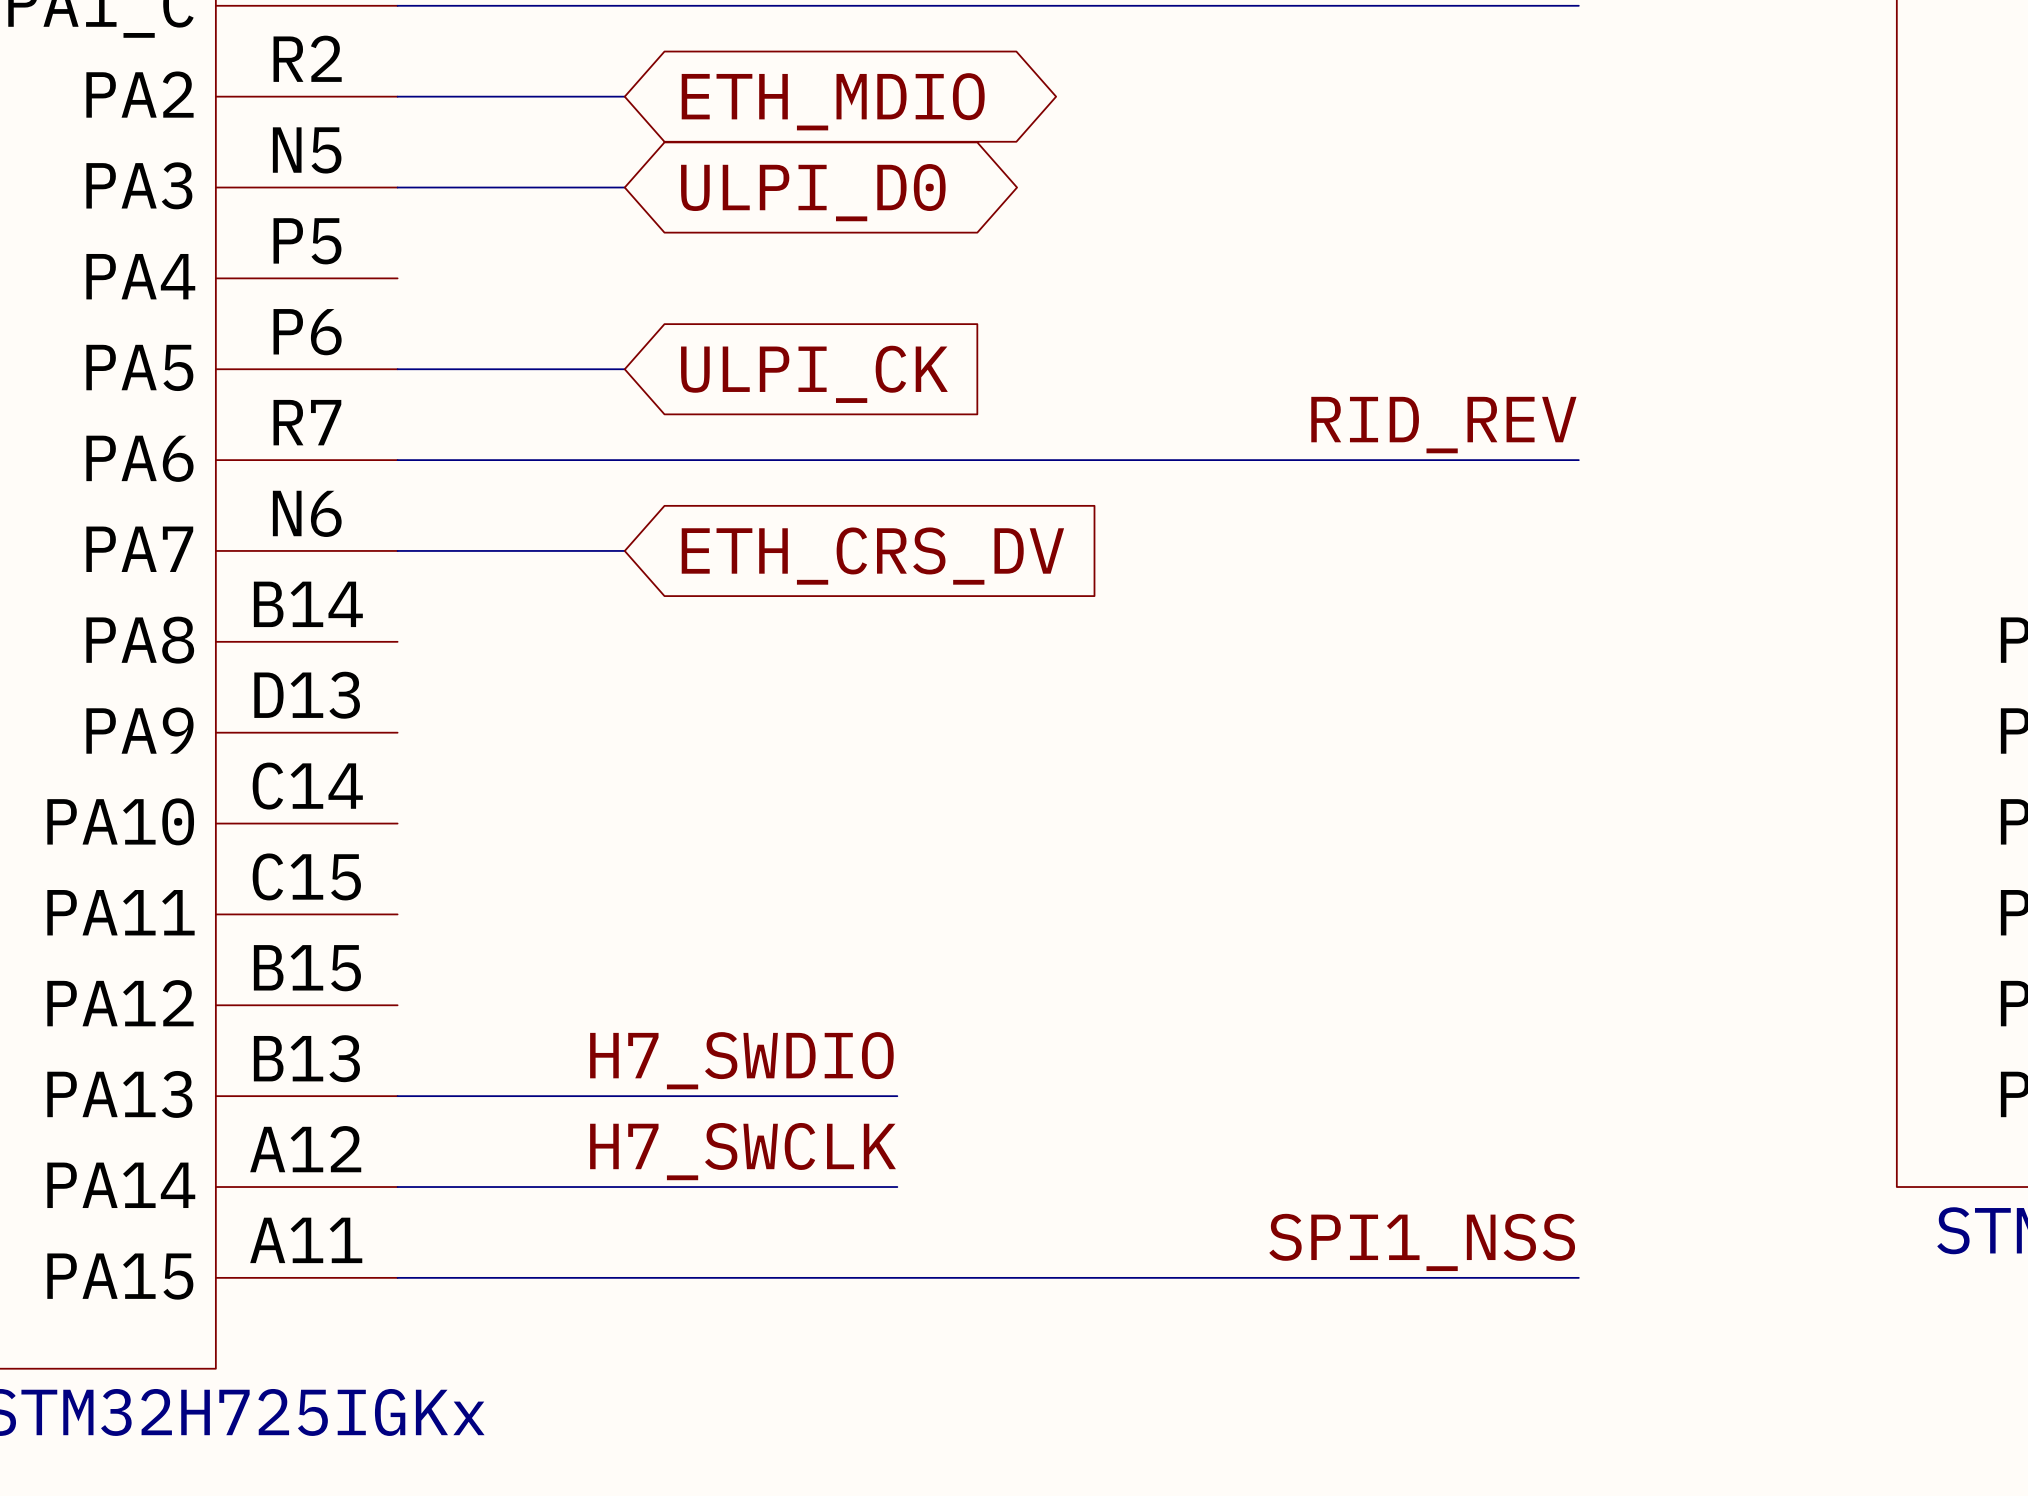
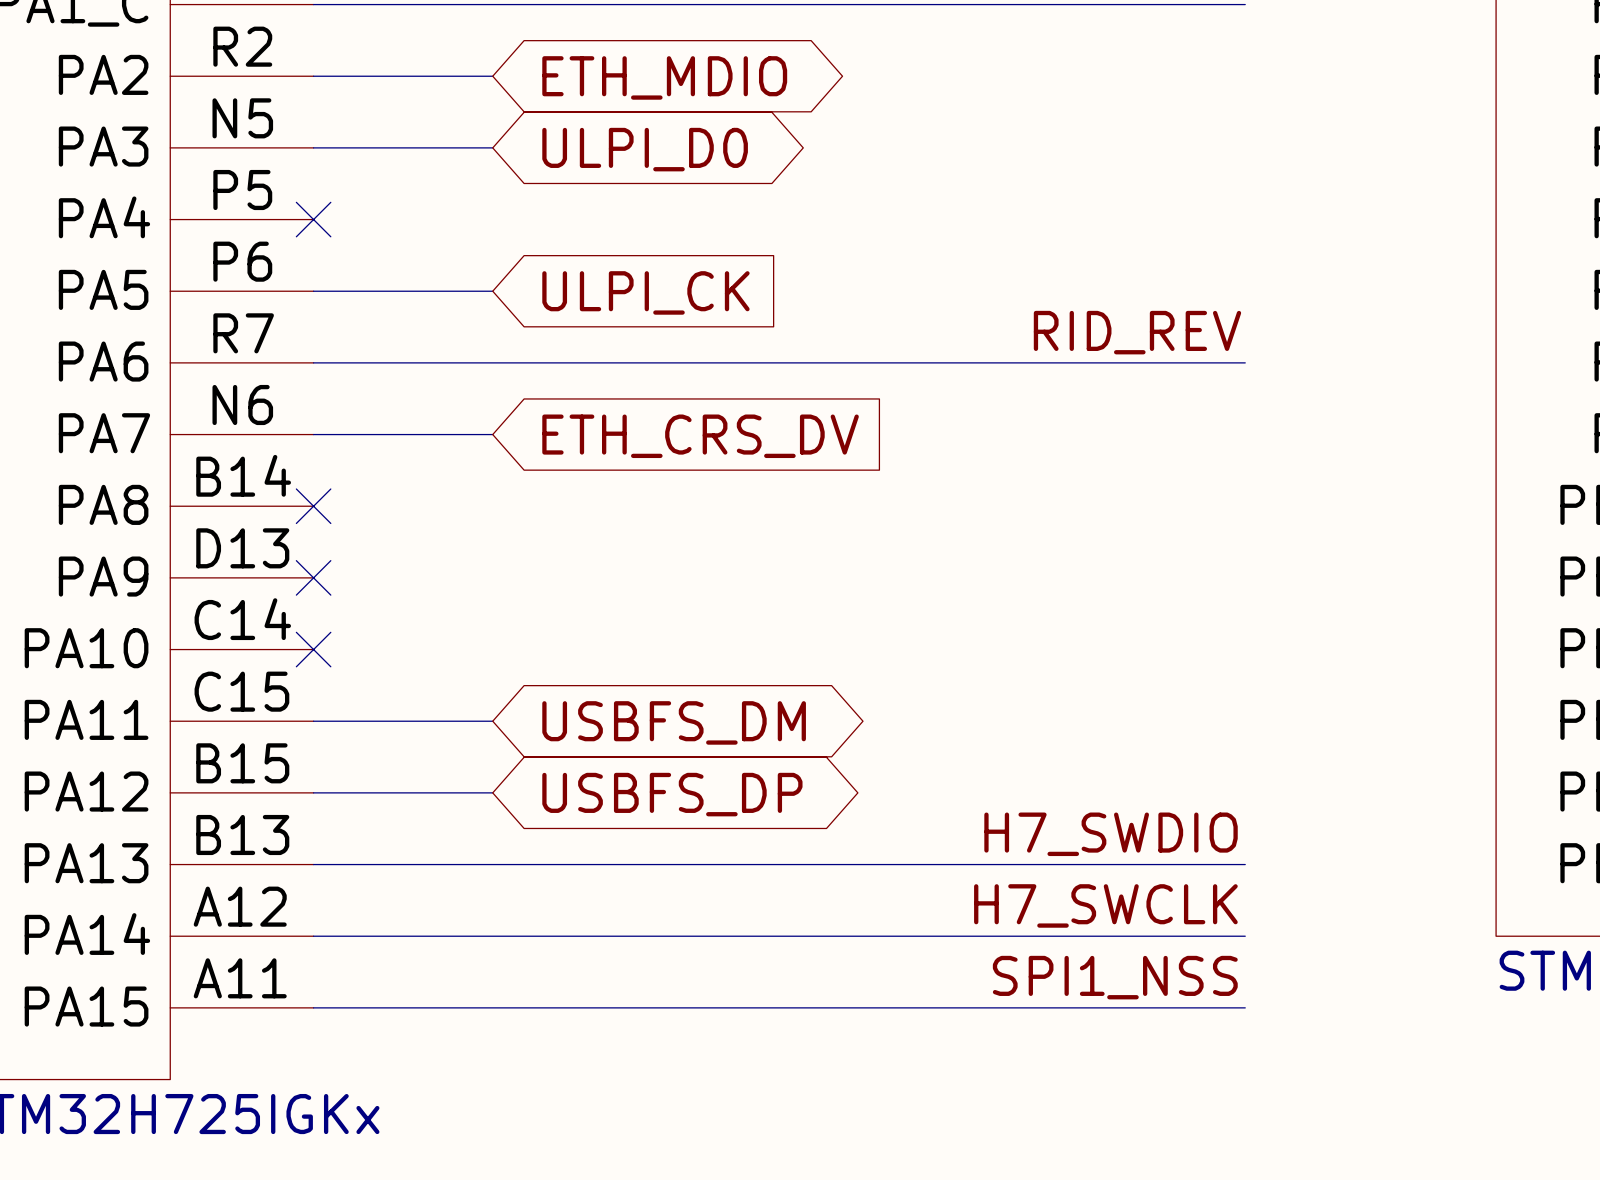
no-connect mark: none -> (313, 219)
no-connect mark: none -> (313, 506)
no-connect mark: none -> (313, 577)
no-connect mark: none -> (313, 649)
wire: none -> (313, 721) (492, 721)
global label: none -> USBFS_DM (674, 722)
wire: none -> (313, 792) (492, 792)
global label: none -> USBFS_DP (672, 794)
label position: H7_SWDIO (741, 1060) -> H7_SWDIO (1111, 834)
wire: none -> (707, 864) (1245, 864)
label position: H7_SWCLK (743, 1151) -> H7_SWCLK (1105, 905)
wire: none -> (707, 936) (1245, 936)

